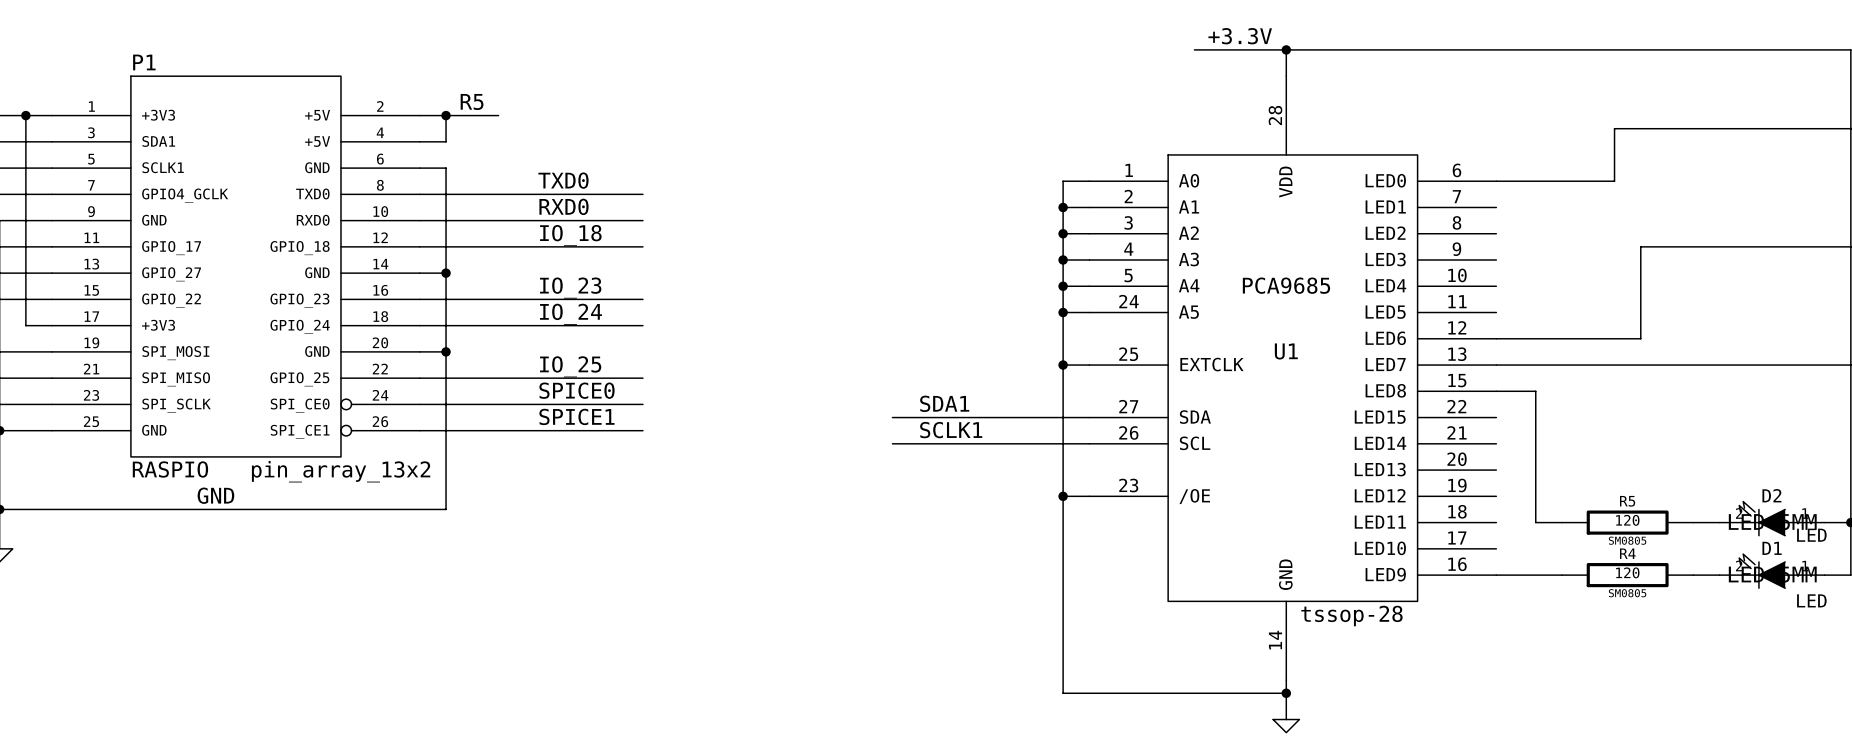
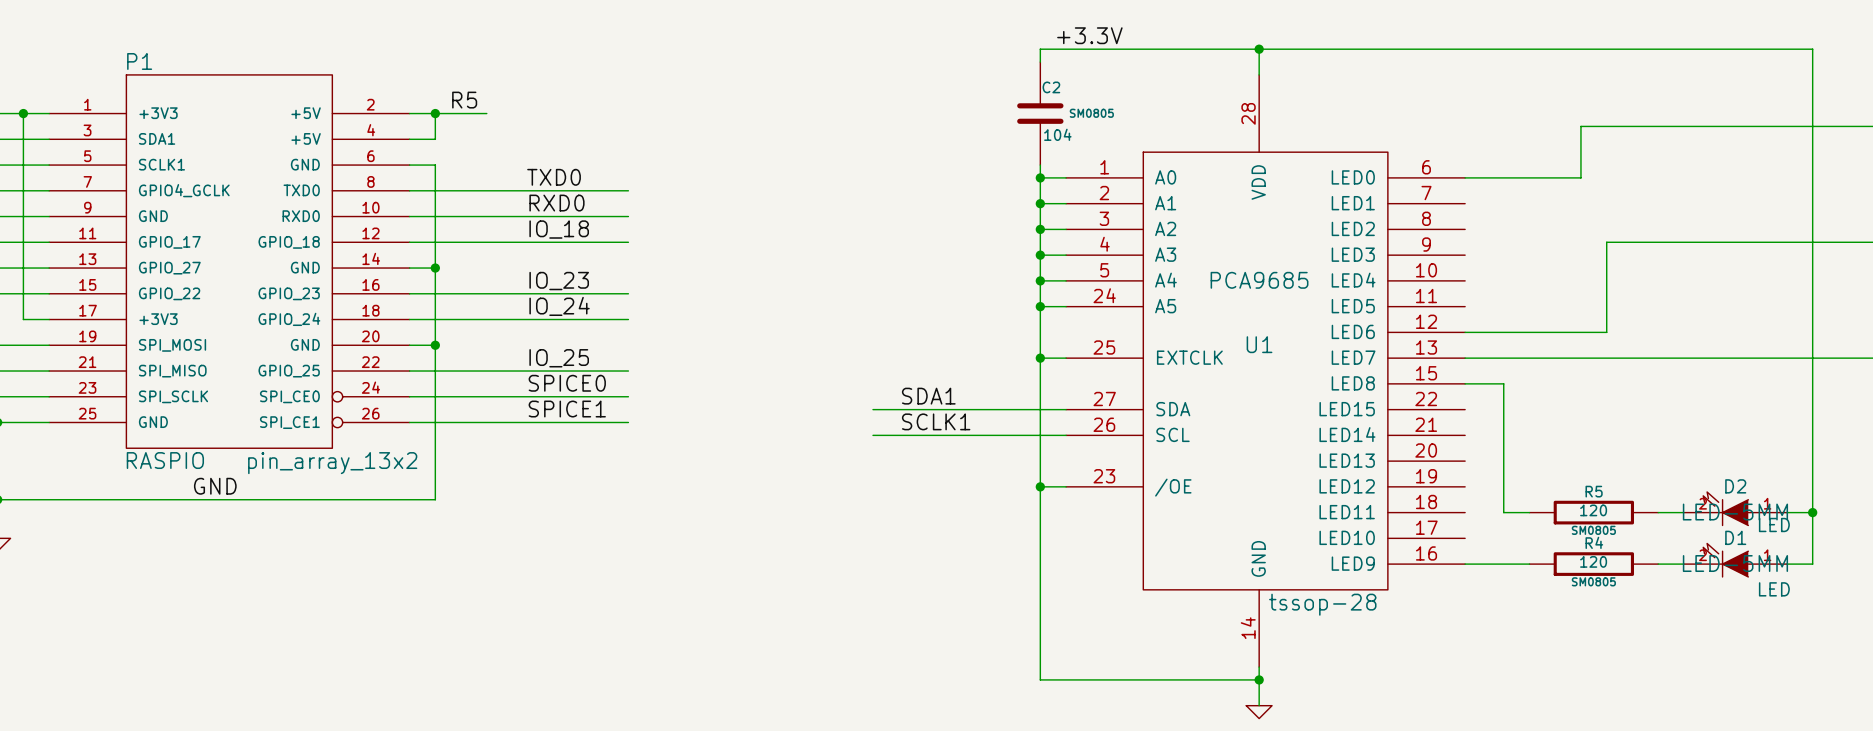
label position: +3.3V (1240, 36) -> +3.3V (1089, 35)
wire: none -> (1169, 49) (1040, 49) (1040, 62)
C2: none -> 104 (1040, 113)
wire: none -> (1040, 165) (1040, 177)
junction: none -> (1040, 177)

